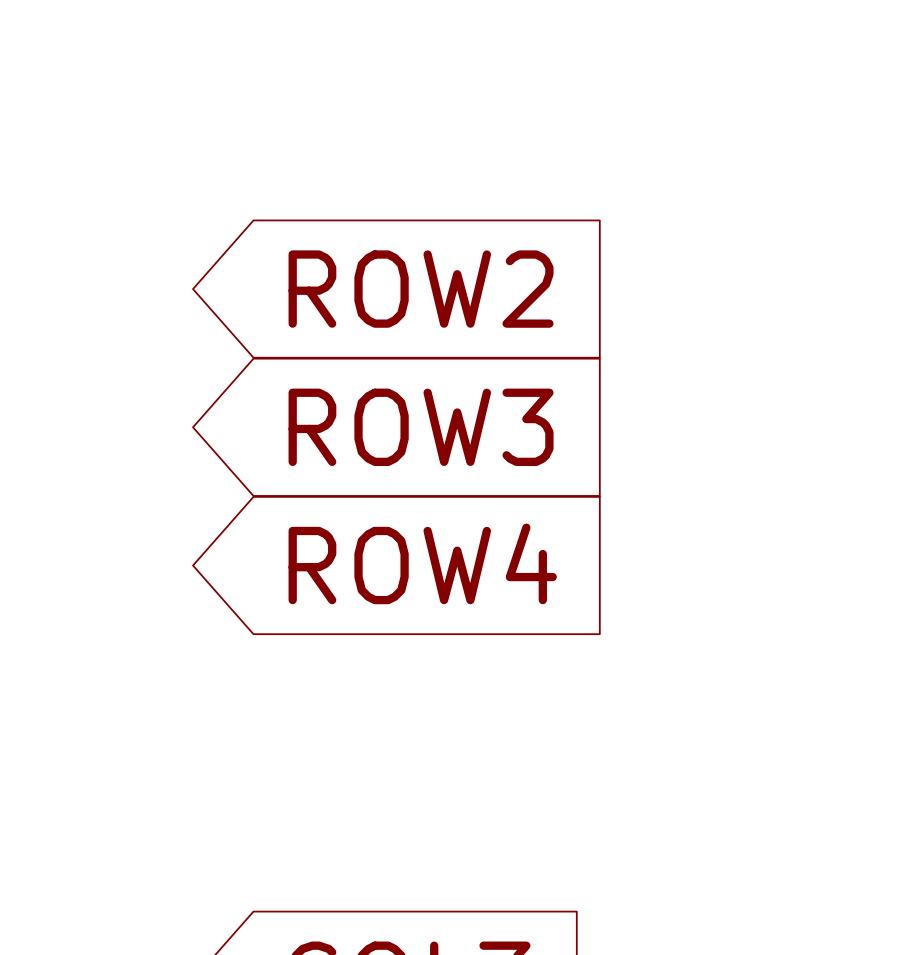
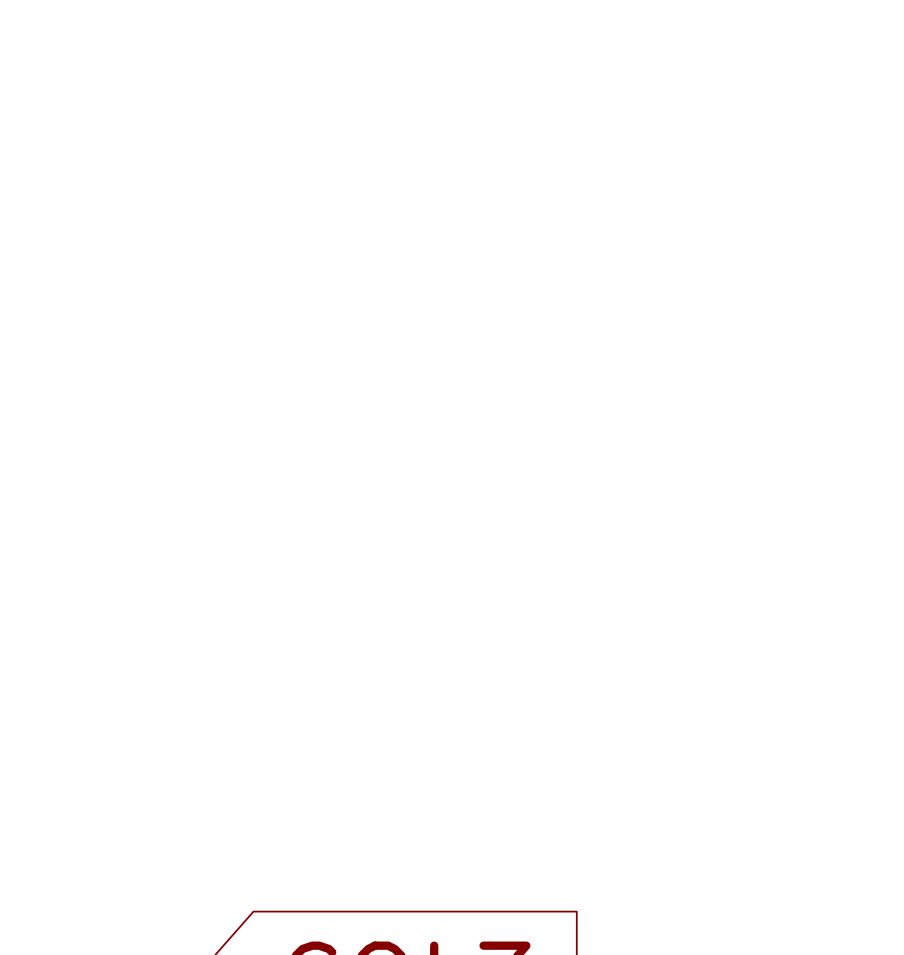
global label: ROW2 (421, 289) -> none
global label: ROW3 (421, 427) -> none
global label: ROW4 (422, 563) -> none

